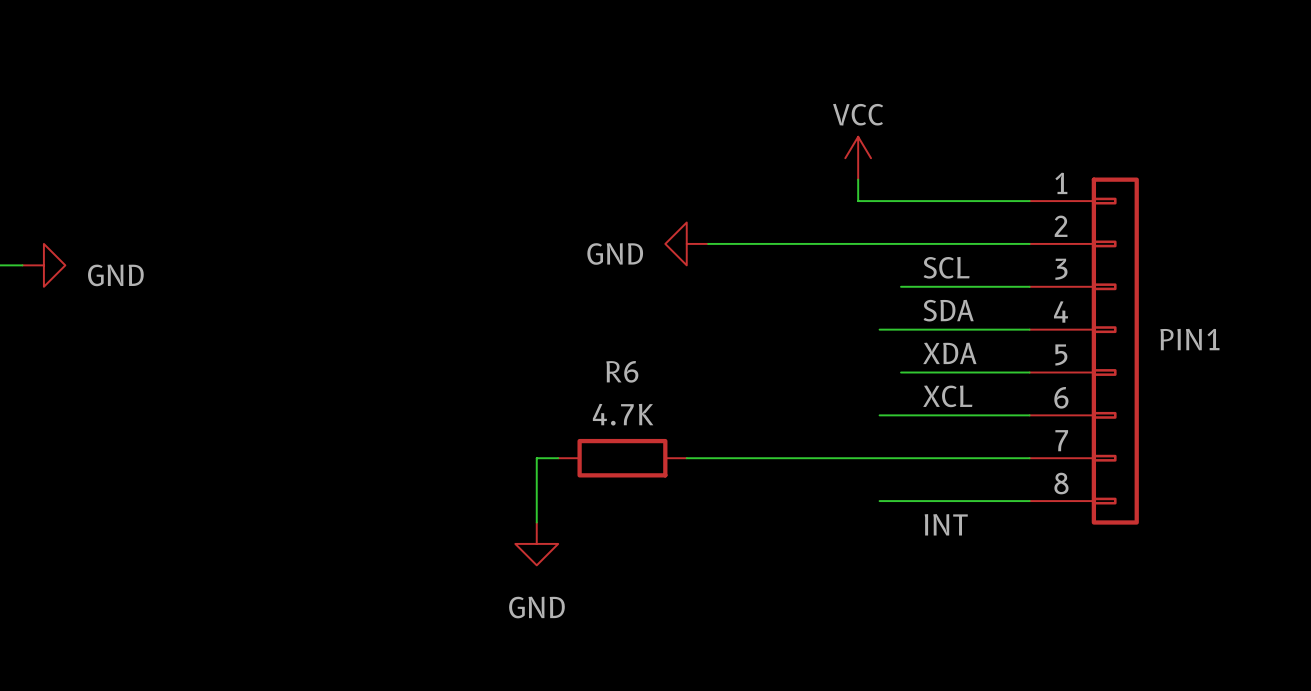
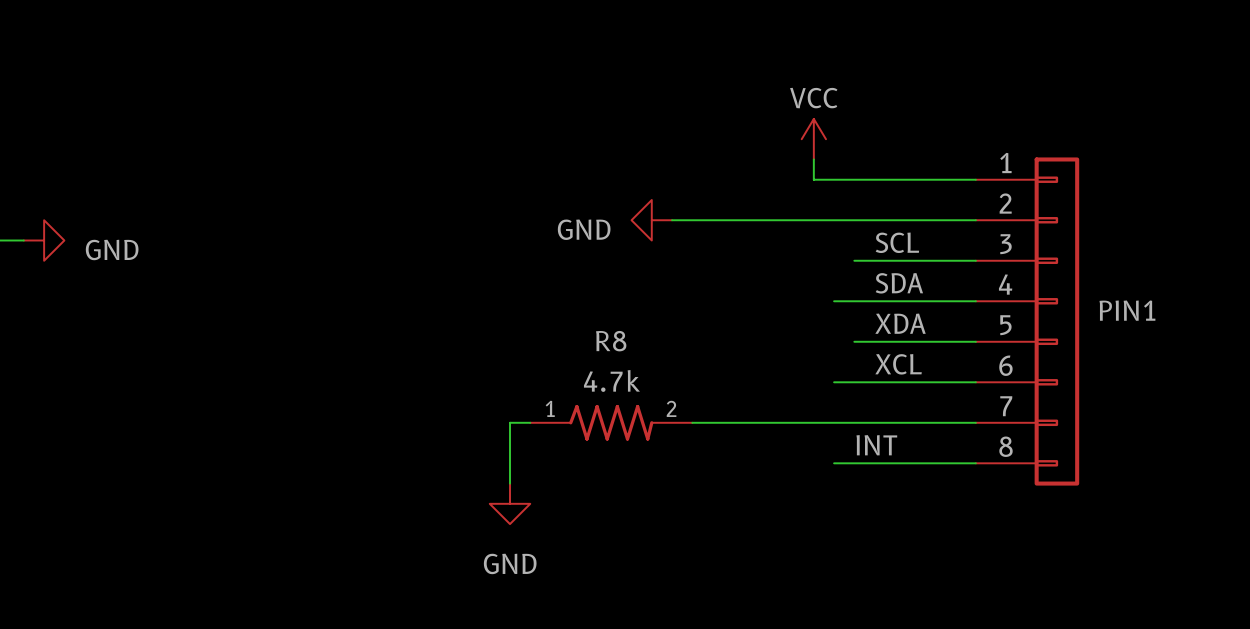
R6: 4.7K (622, 458) -> none
R8: none -> 4.7k (611, 422)
label position: INT (946, 524) -> INT (876, 445)

